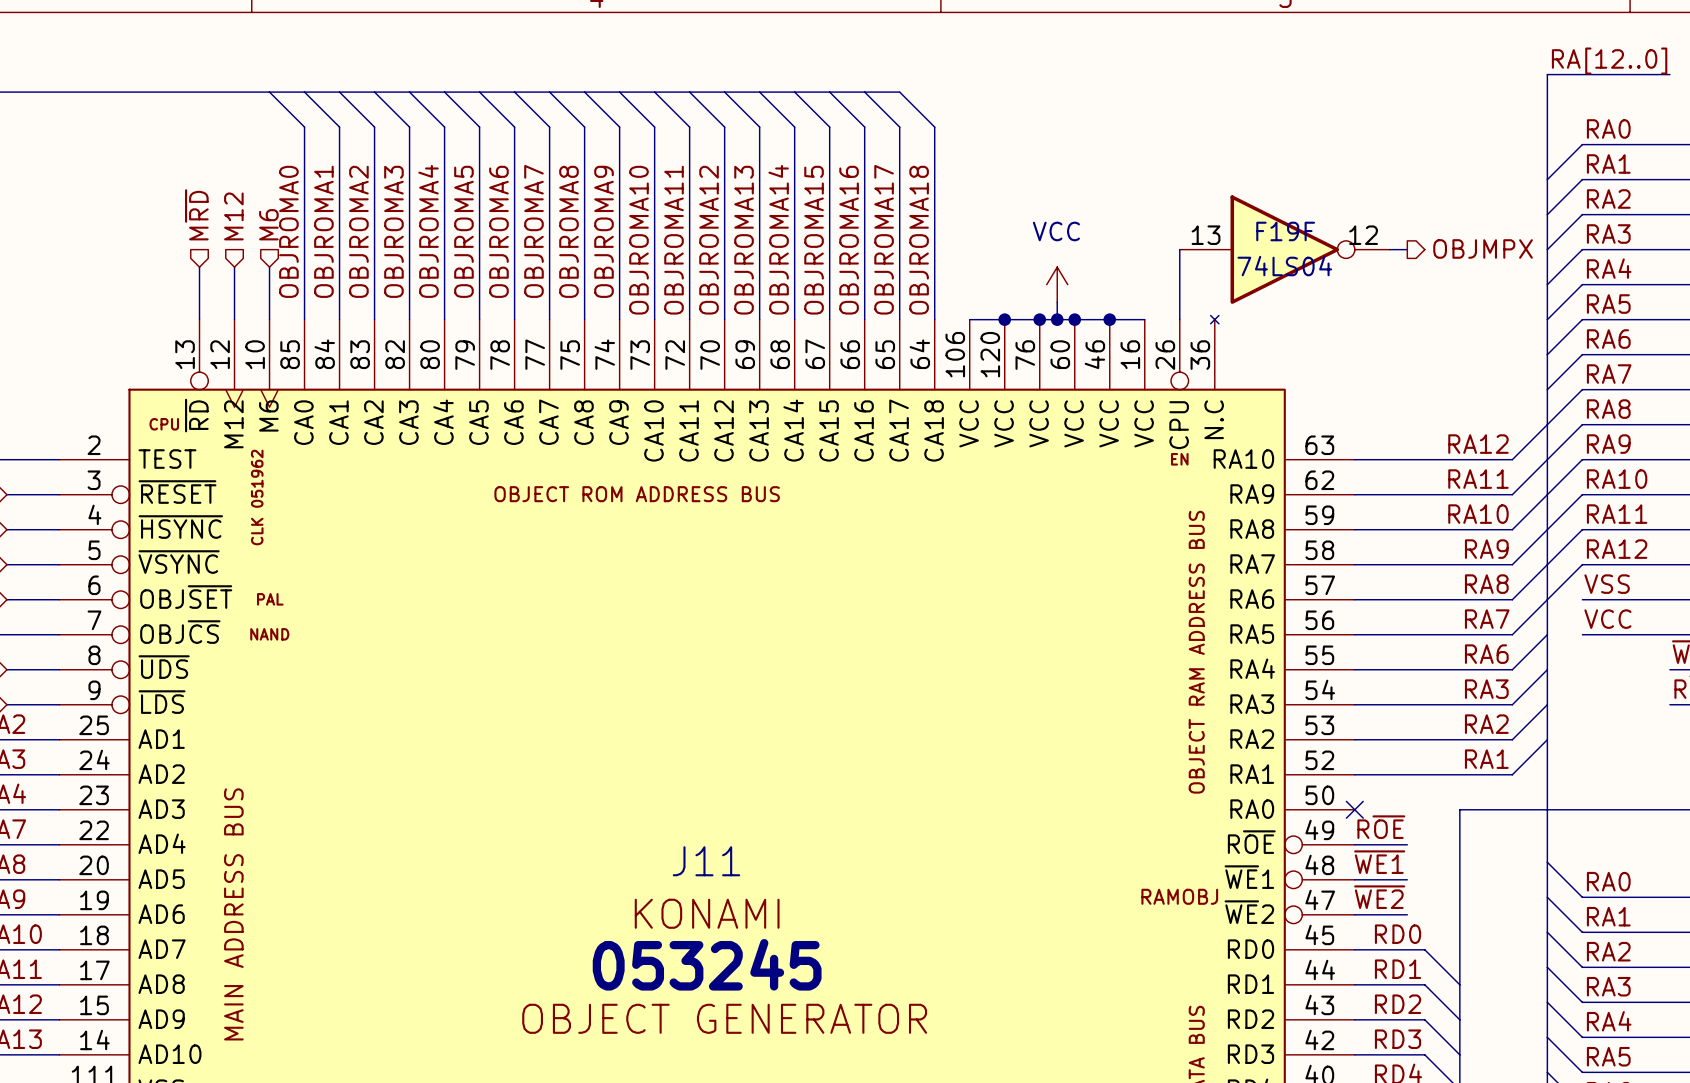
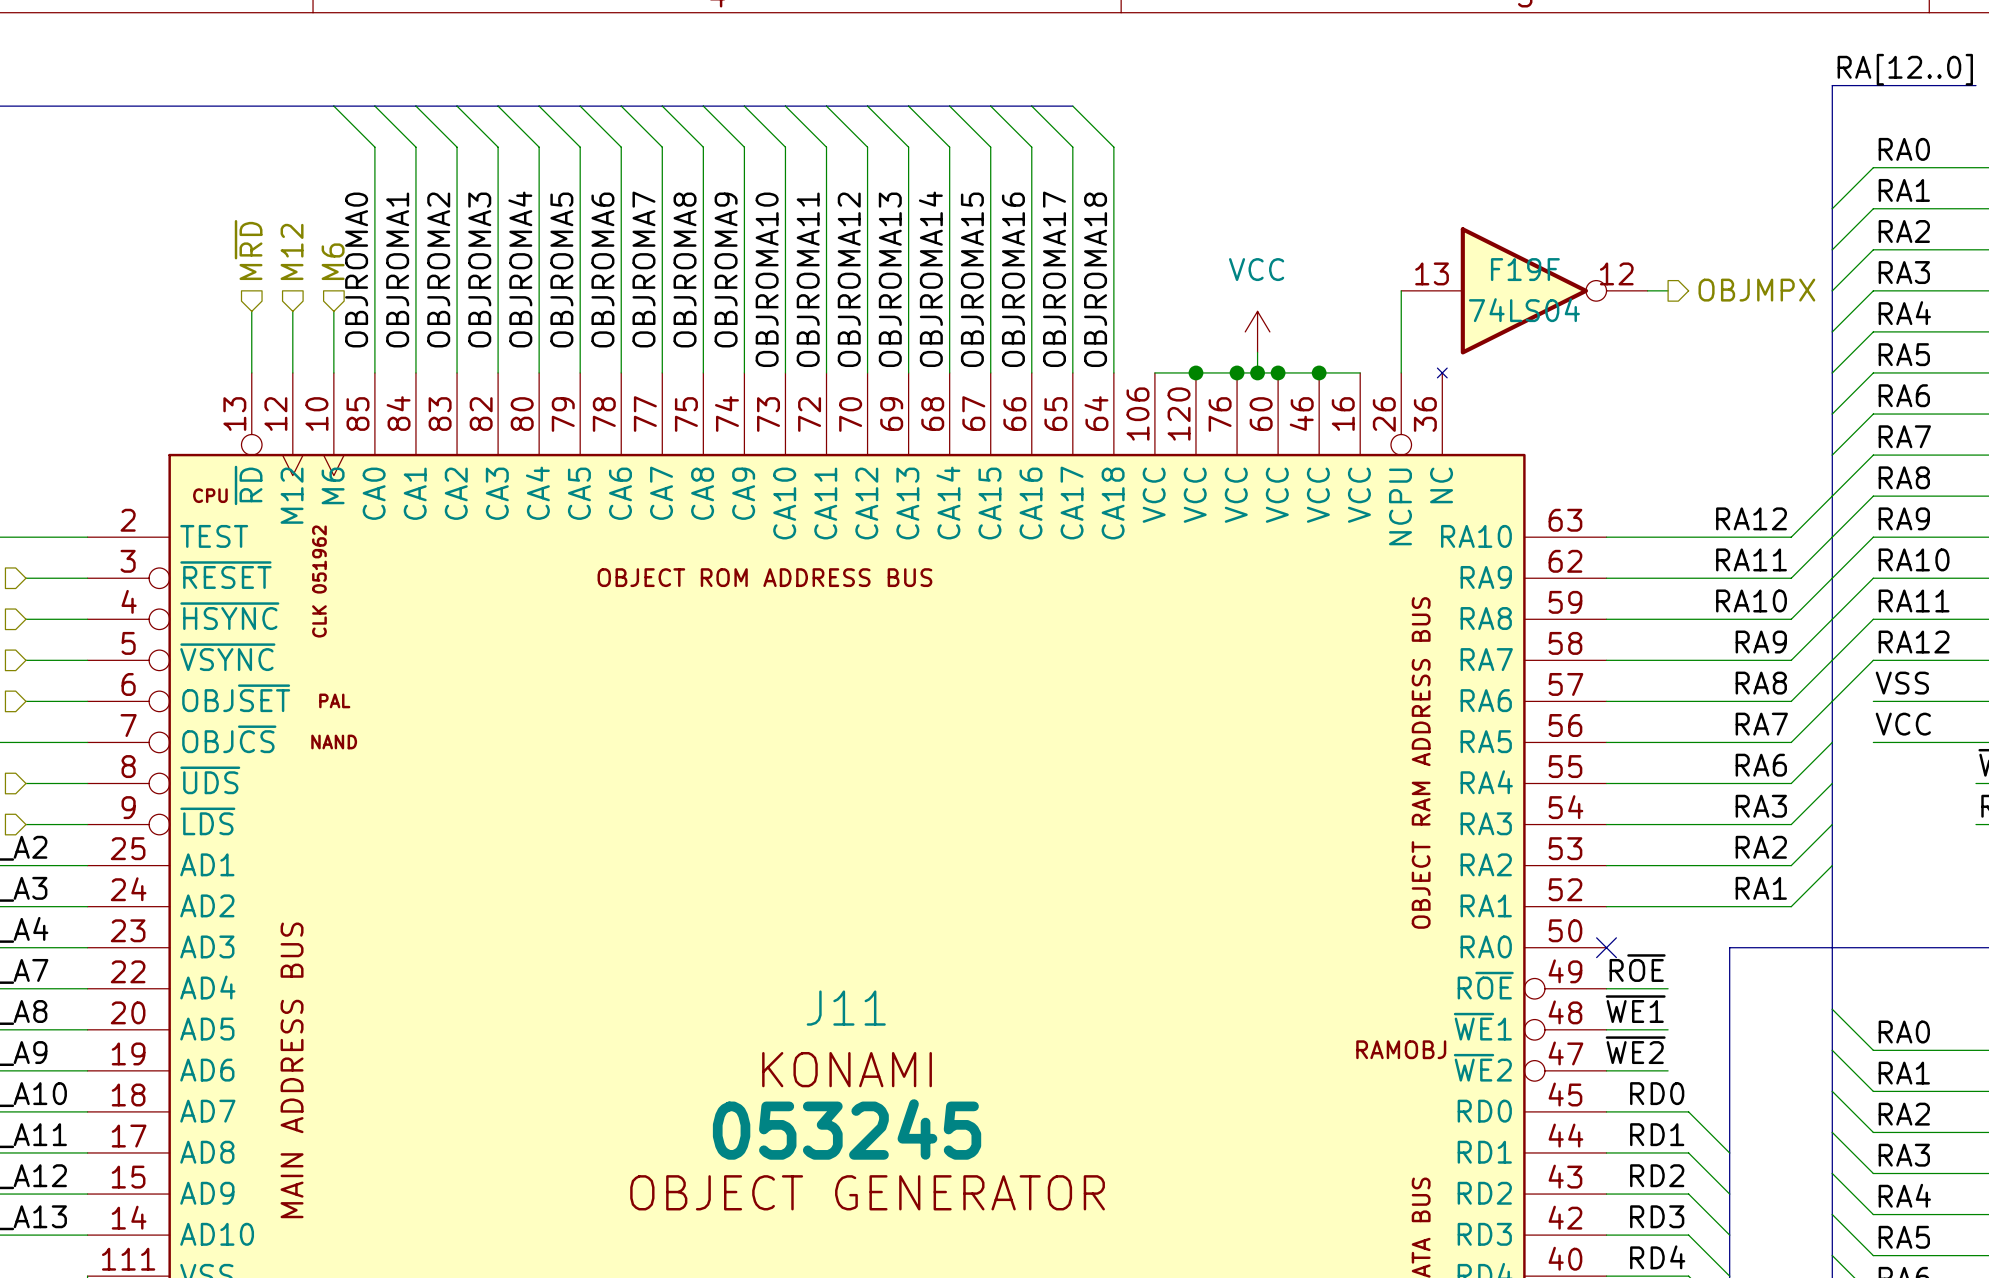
J11 pin name: N.C (1214, 419) -> NC (1441, 485)
J11 pin name: CPU (1179, 425) -> NCPU (1400, 506)
J11 text: EN (1179, 459) -> none

